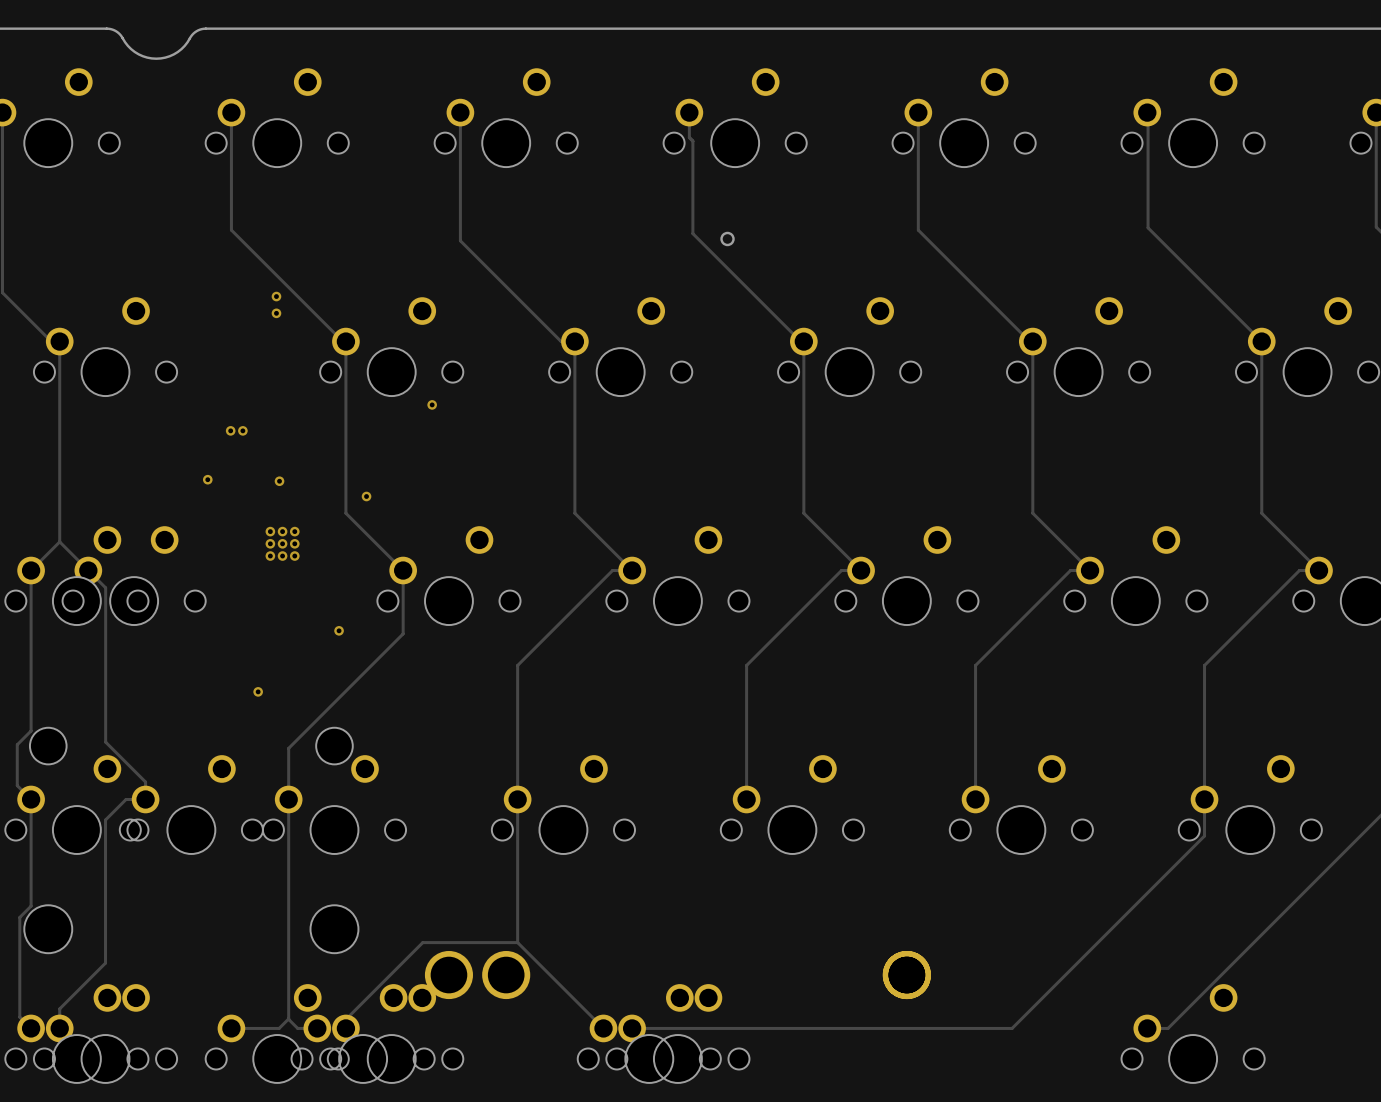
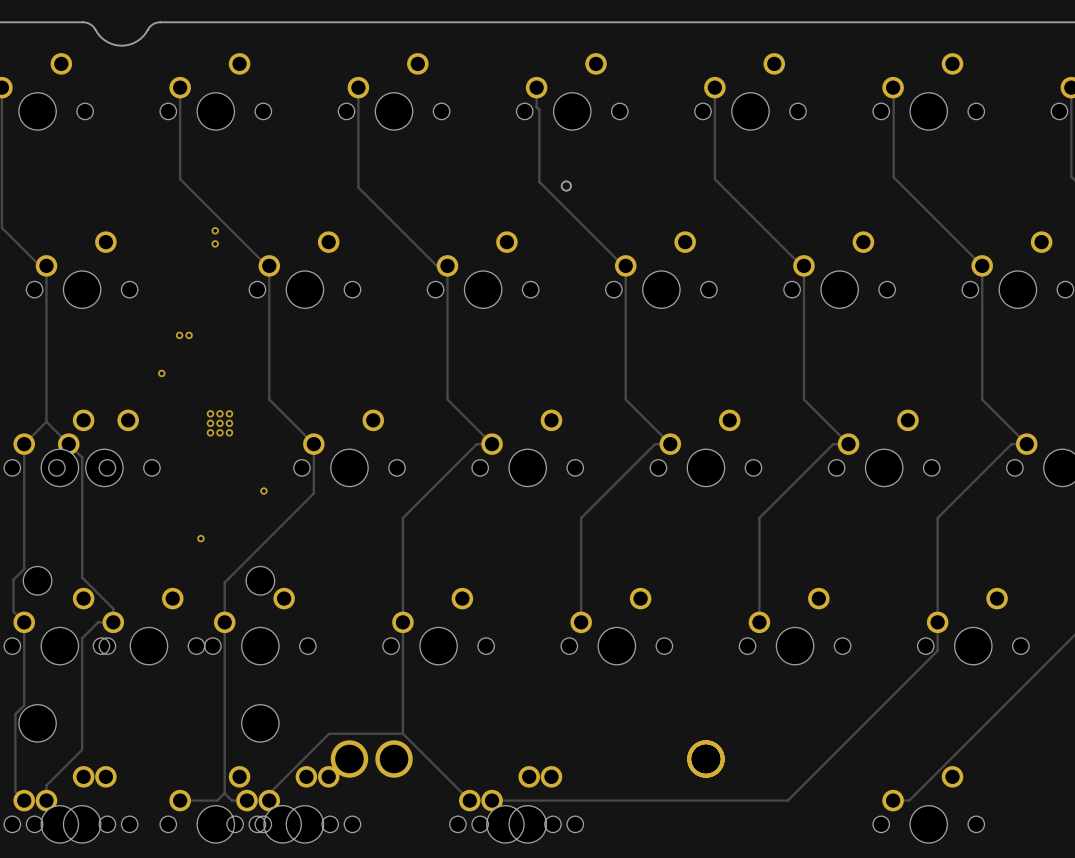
via: (432, 404) -> none
via: (279, 481) -> none
via: (366, 496) -> none

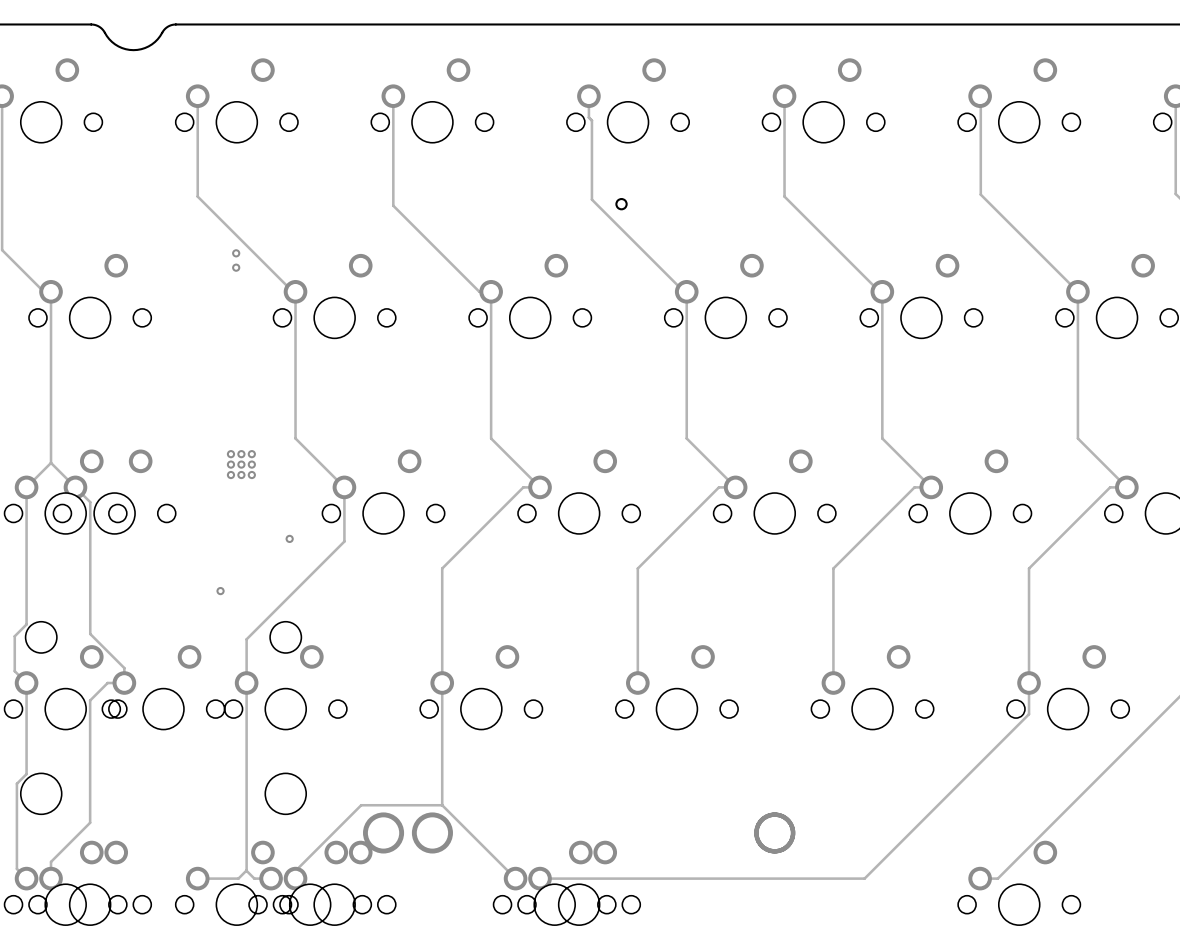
via: (179, 335) -> none
via: (189, 335) -> none
via: (161, 373) -> none

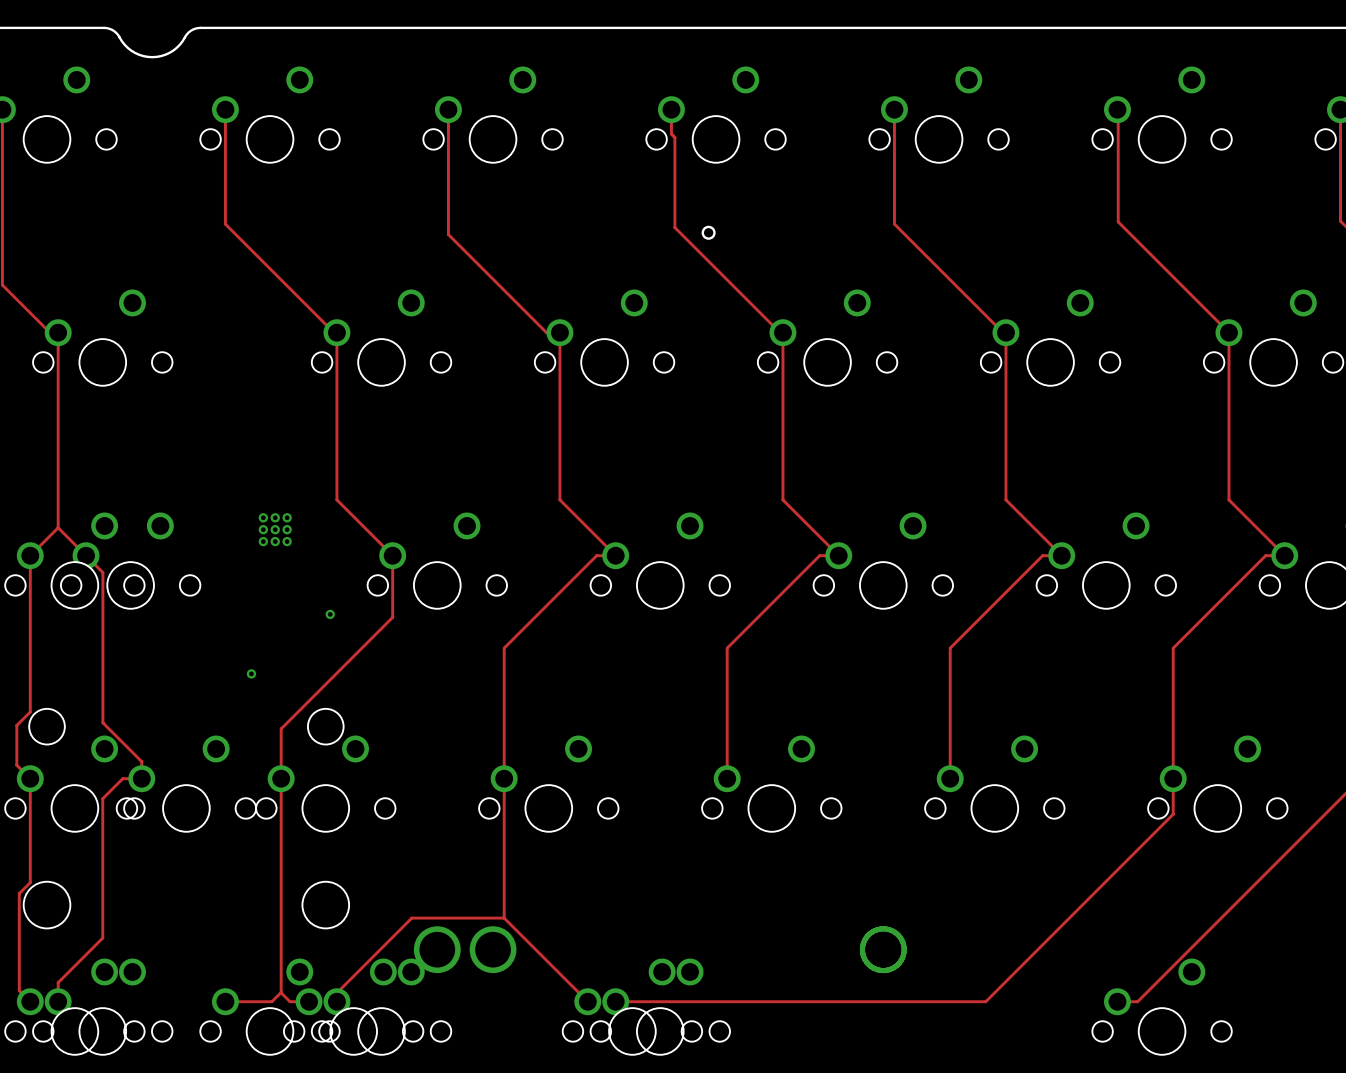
via: (236, 253) -> none
via: (236, 267) -> none

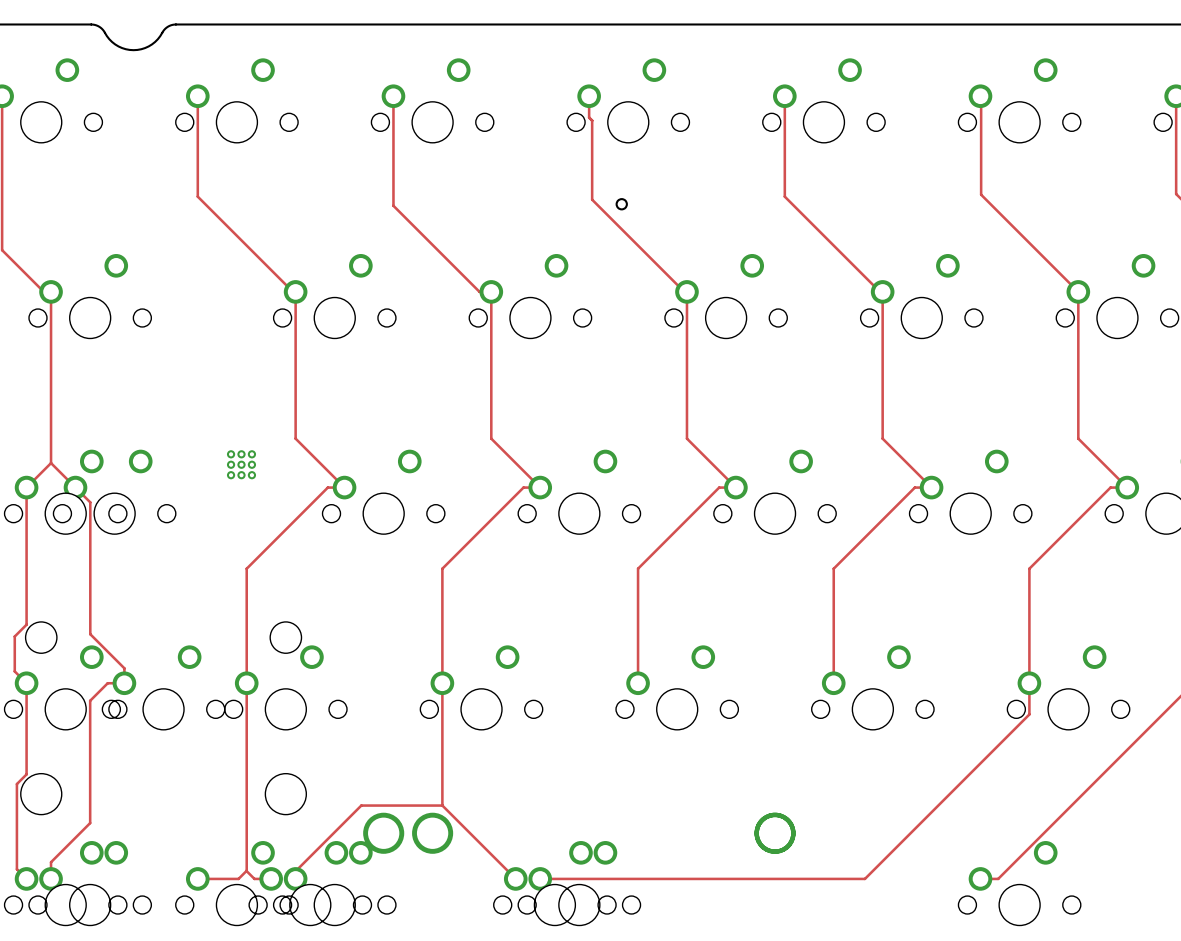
track: (392, 555) (392, 617) (281, 728) -> (344, 487) (327, 487) (246, 568) (246, 639)
via: (330, 614) -> none
via: (251, 673) -> none

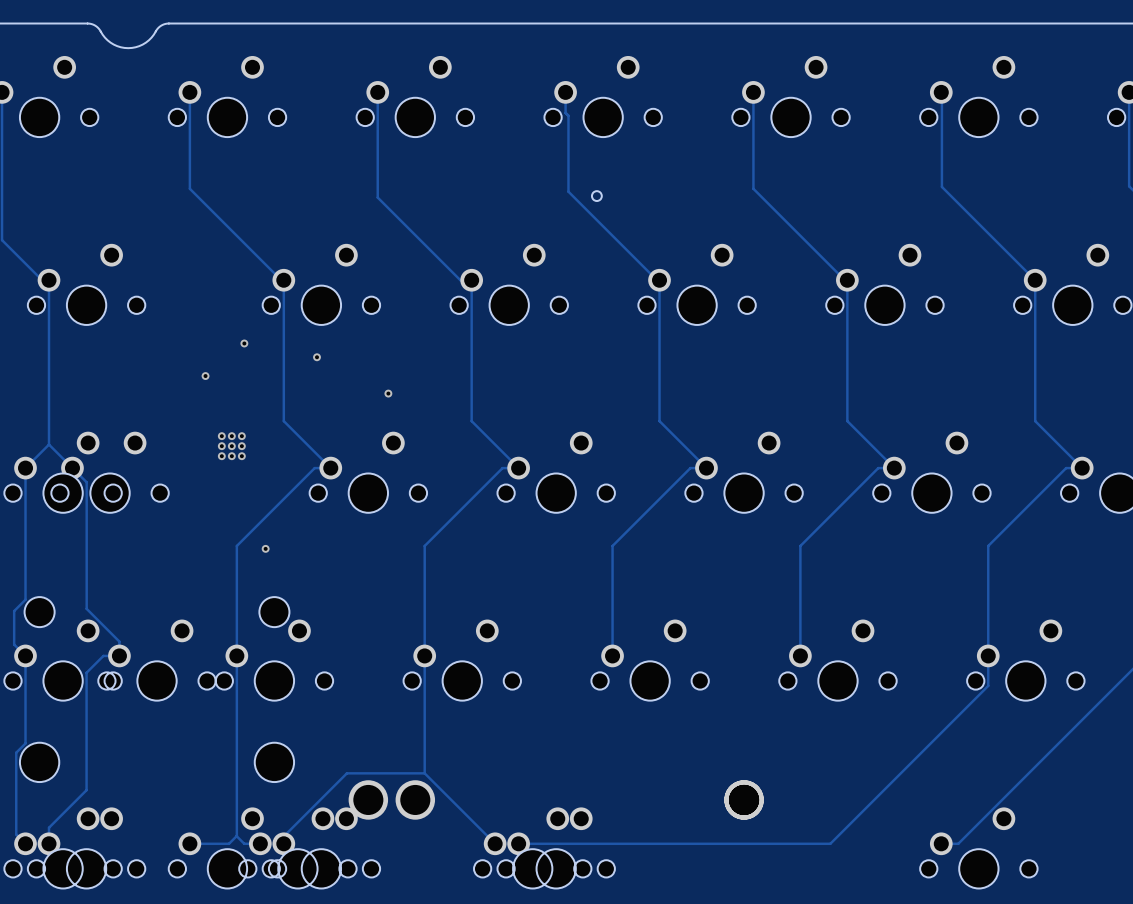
via: none -> (244, 343)
via: none -> (317, 357)
via: none -> (205, 376)
via: none -> (388, 393)
via: none -> (265, 548)

